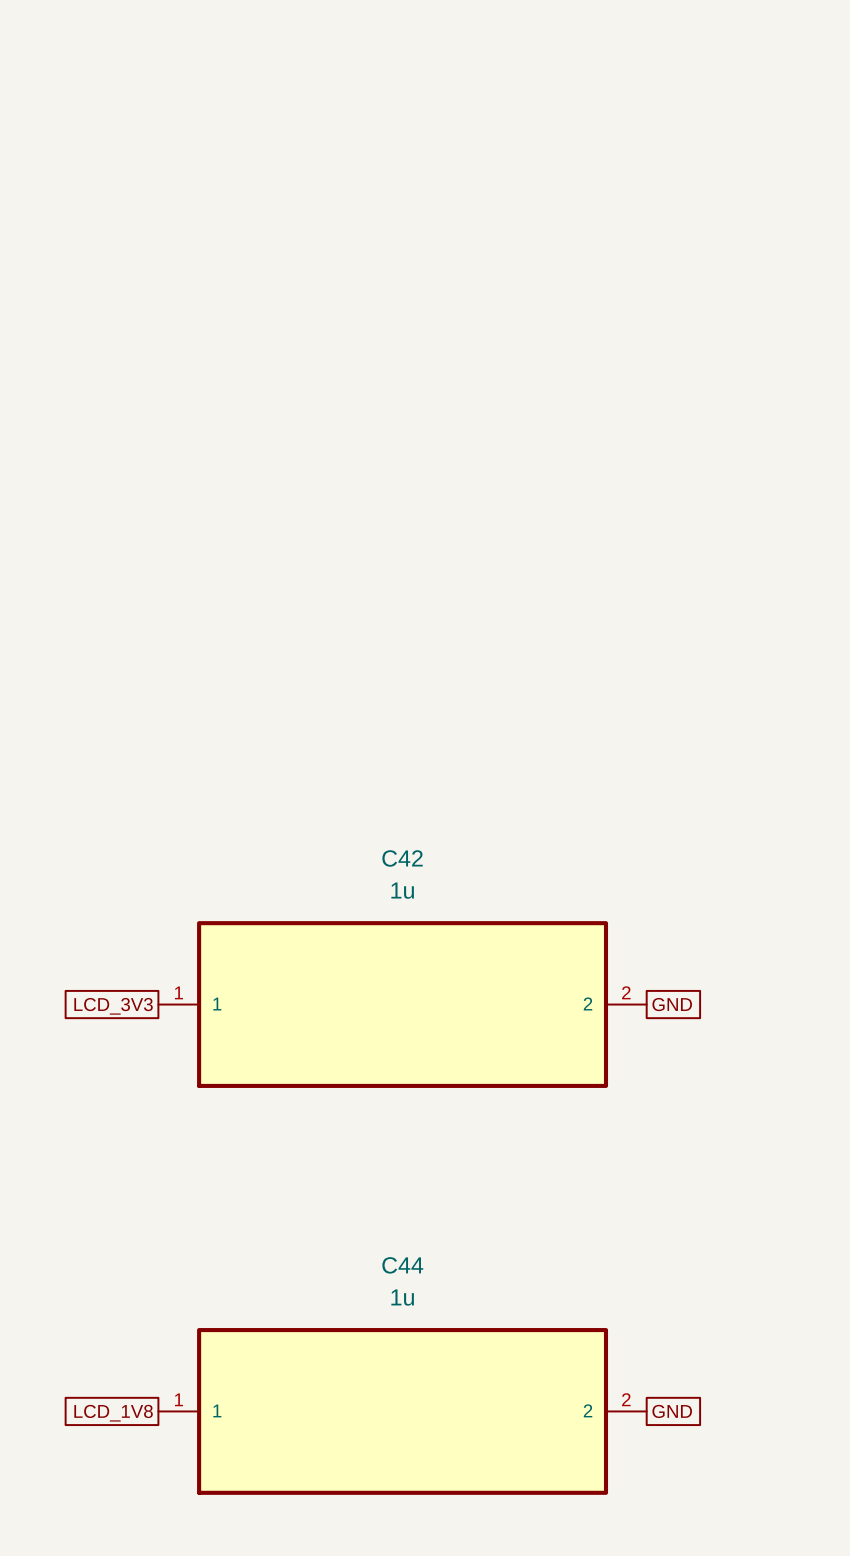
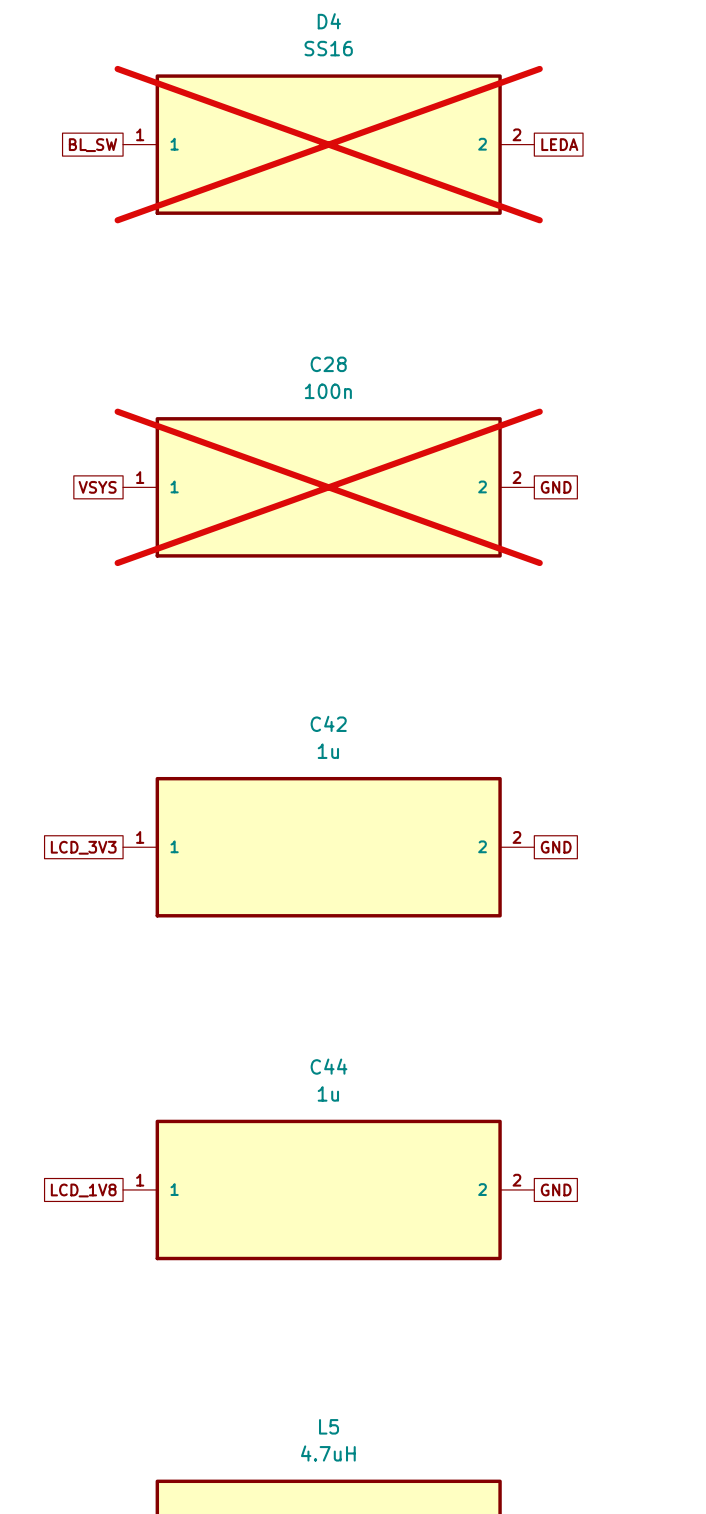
D4: none -> SS16 (328, 144)
global label: none -> LEDA (559, 144)
global label: none -> BL_SW (92, 145)
global label: none -> VSYS (97, 487)
C28: none -> 100n (328, 487)
global label: none -> GND (556, 487)

